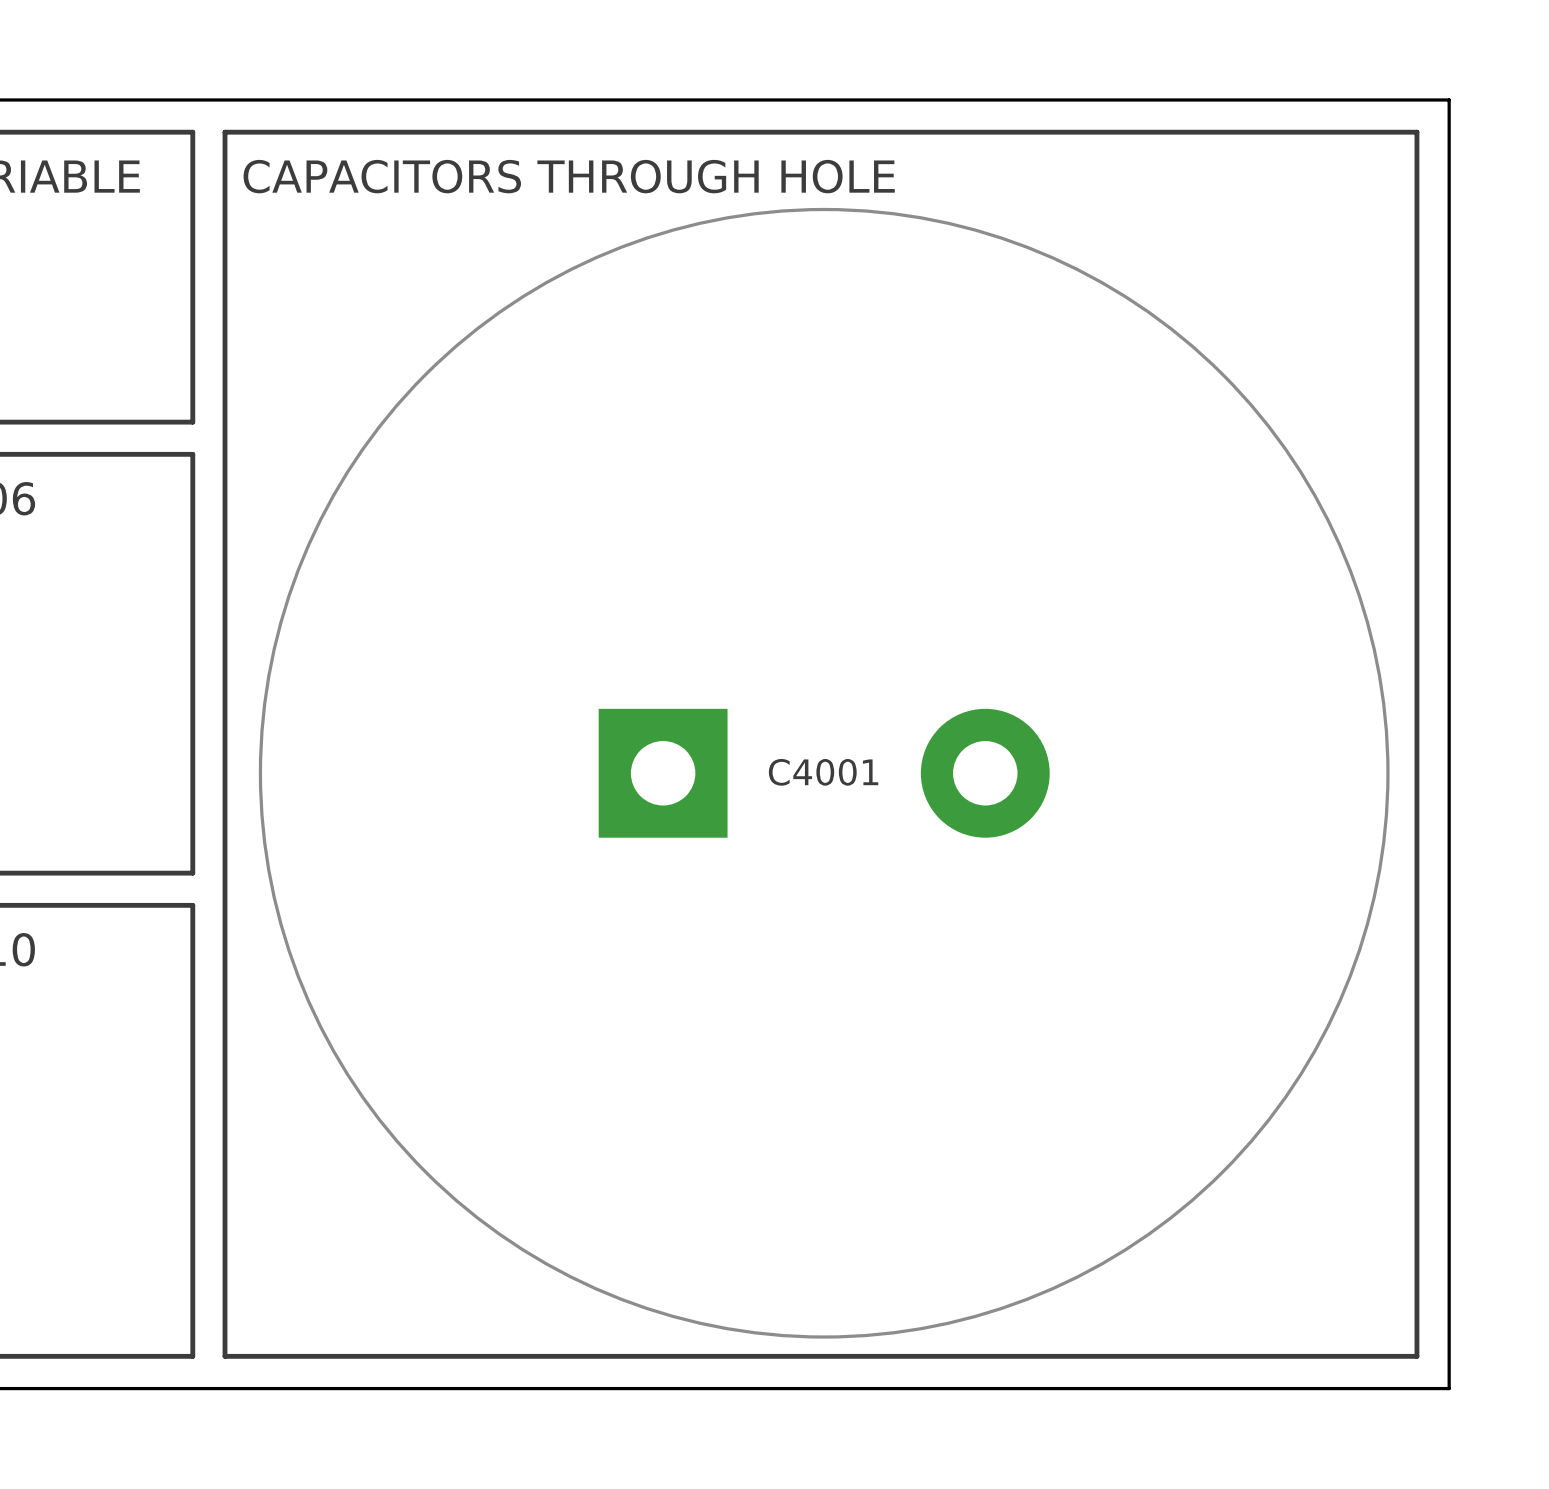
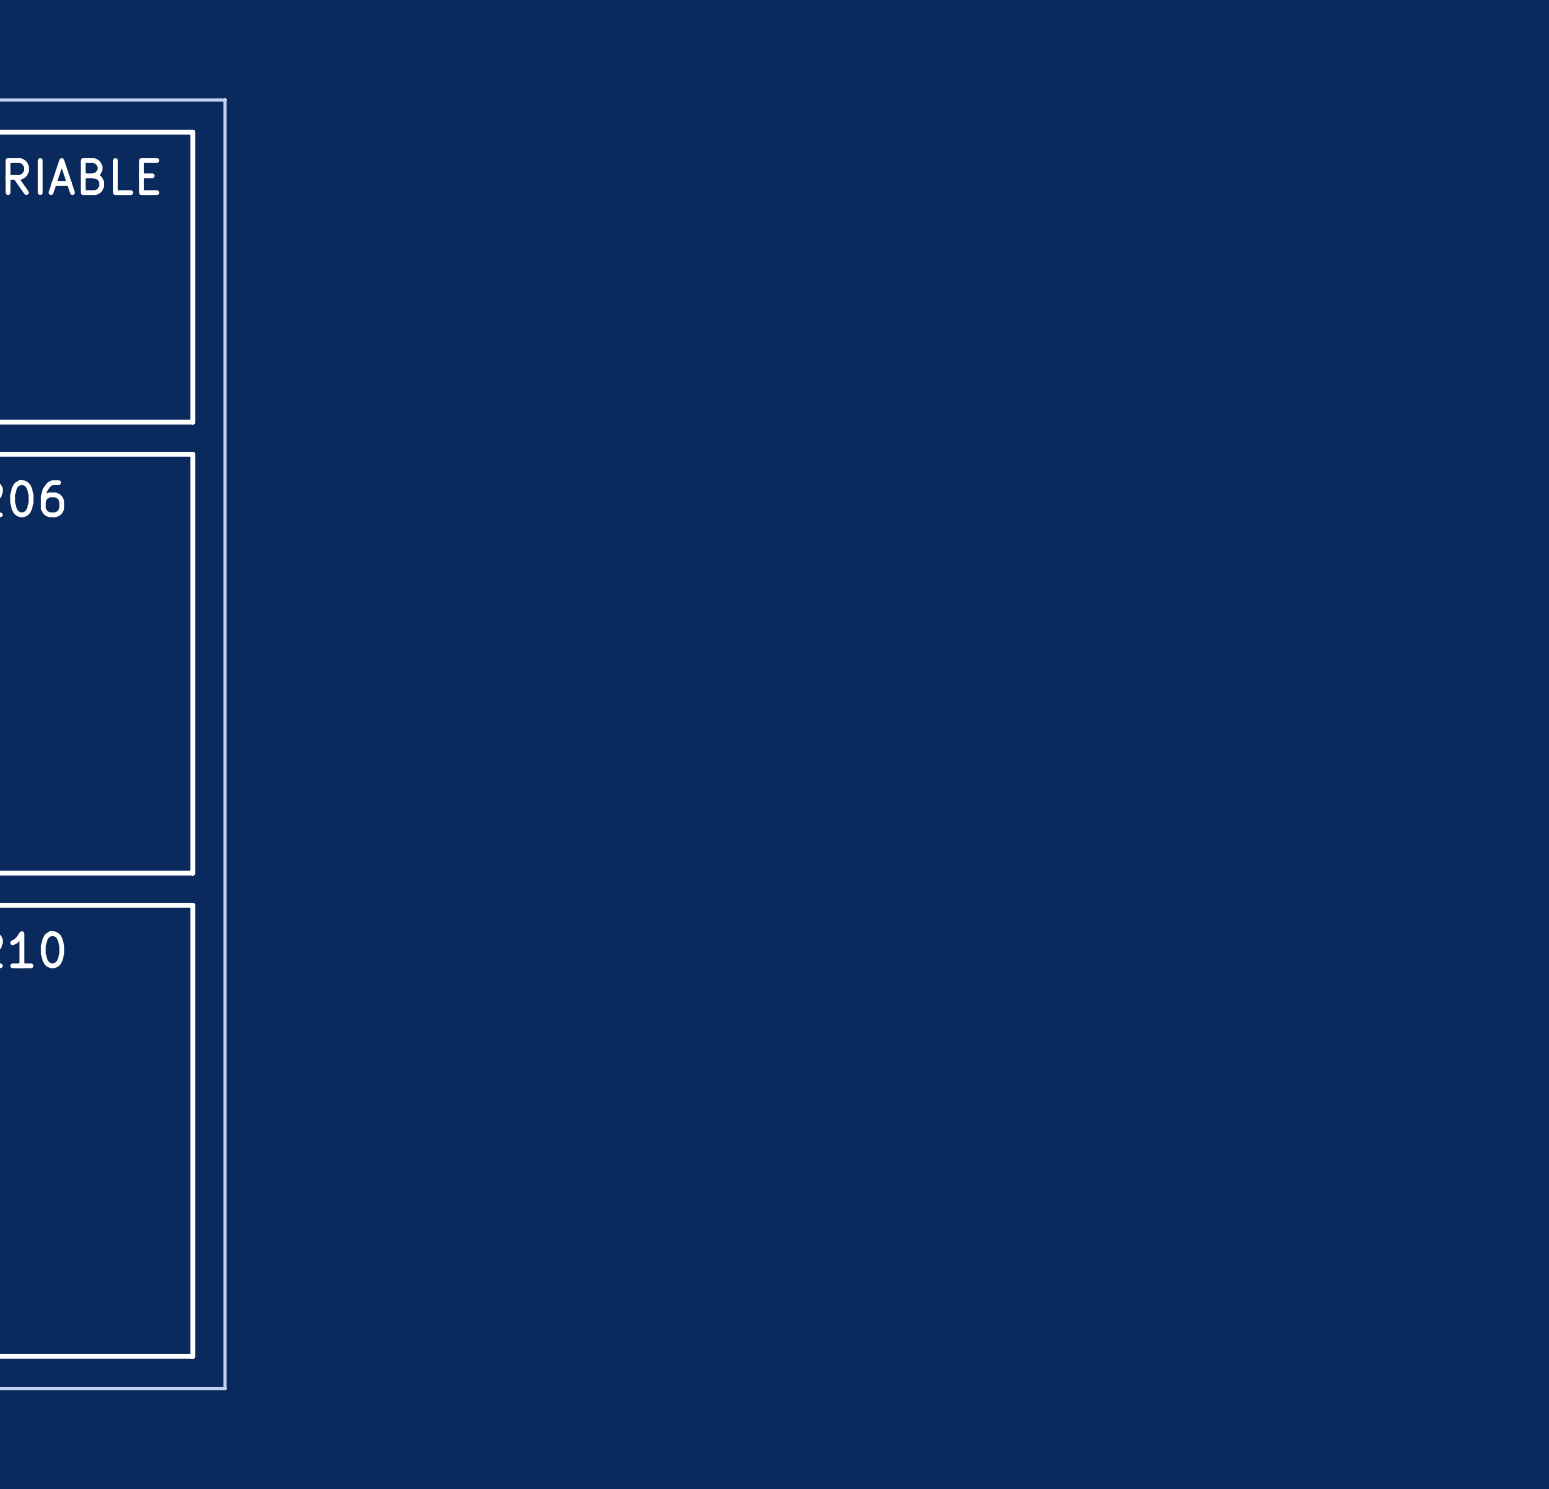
board edge: (225, 99) (1449, 99) (1449, 1388) (225, 1388) -> (225, 99) (225, 1388)
line: (225, 132) (1416, 132) (1416, 1356) (225, 1356) (225, 132) -> none
text: CAPACITORS THROUGH HOLE (569, 176) -> none
C4001: (824, 773) -> none

